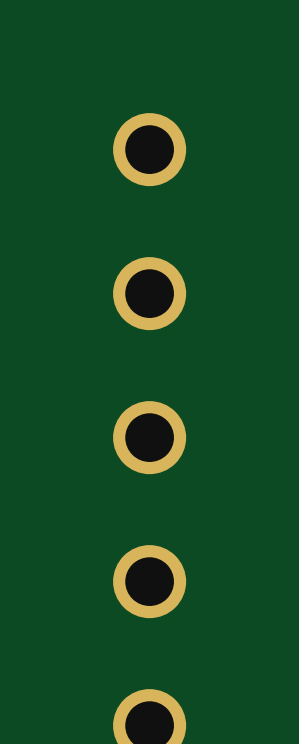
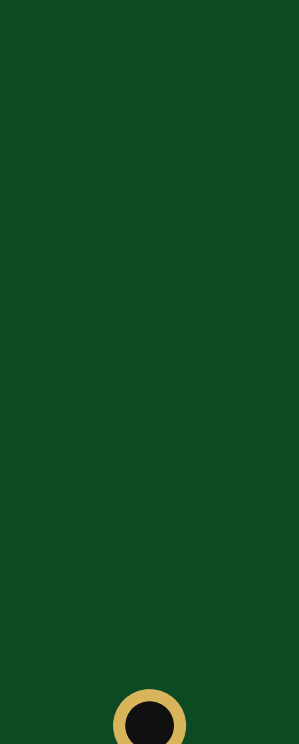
part: (149, 149) -> none
part: (149, 293) -> none
part: (149, 437) -> none
part: (149, 581) -> none

